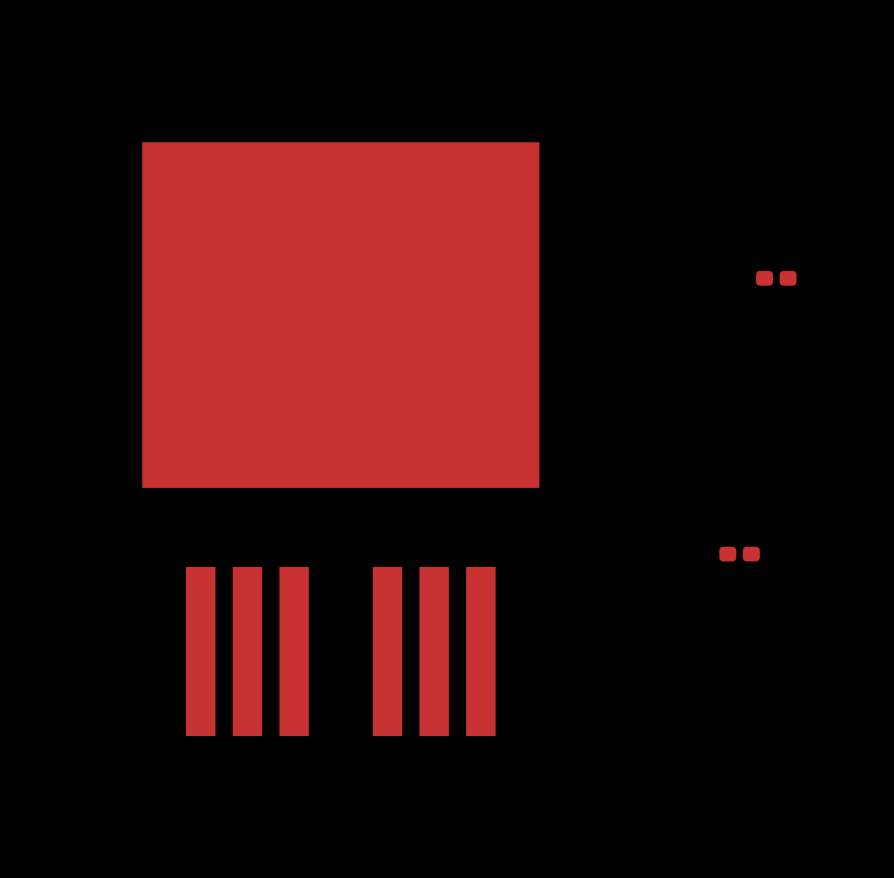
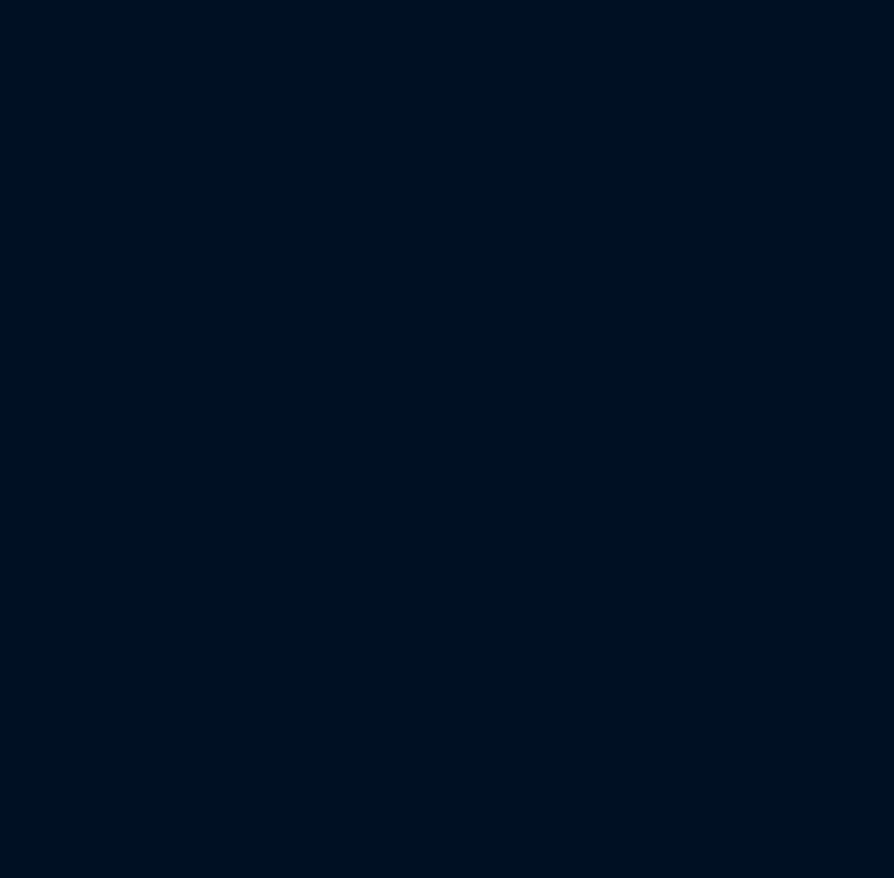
part: (776, 278) -> none
part: (340, 439) -> none
part: (739, 554) -> none

